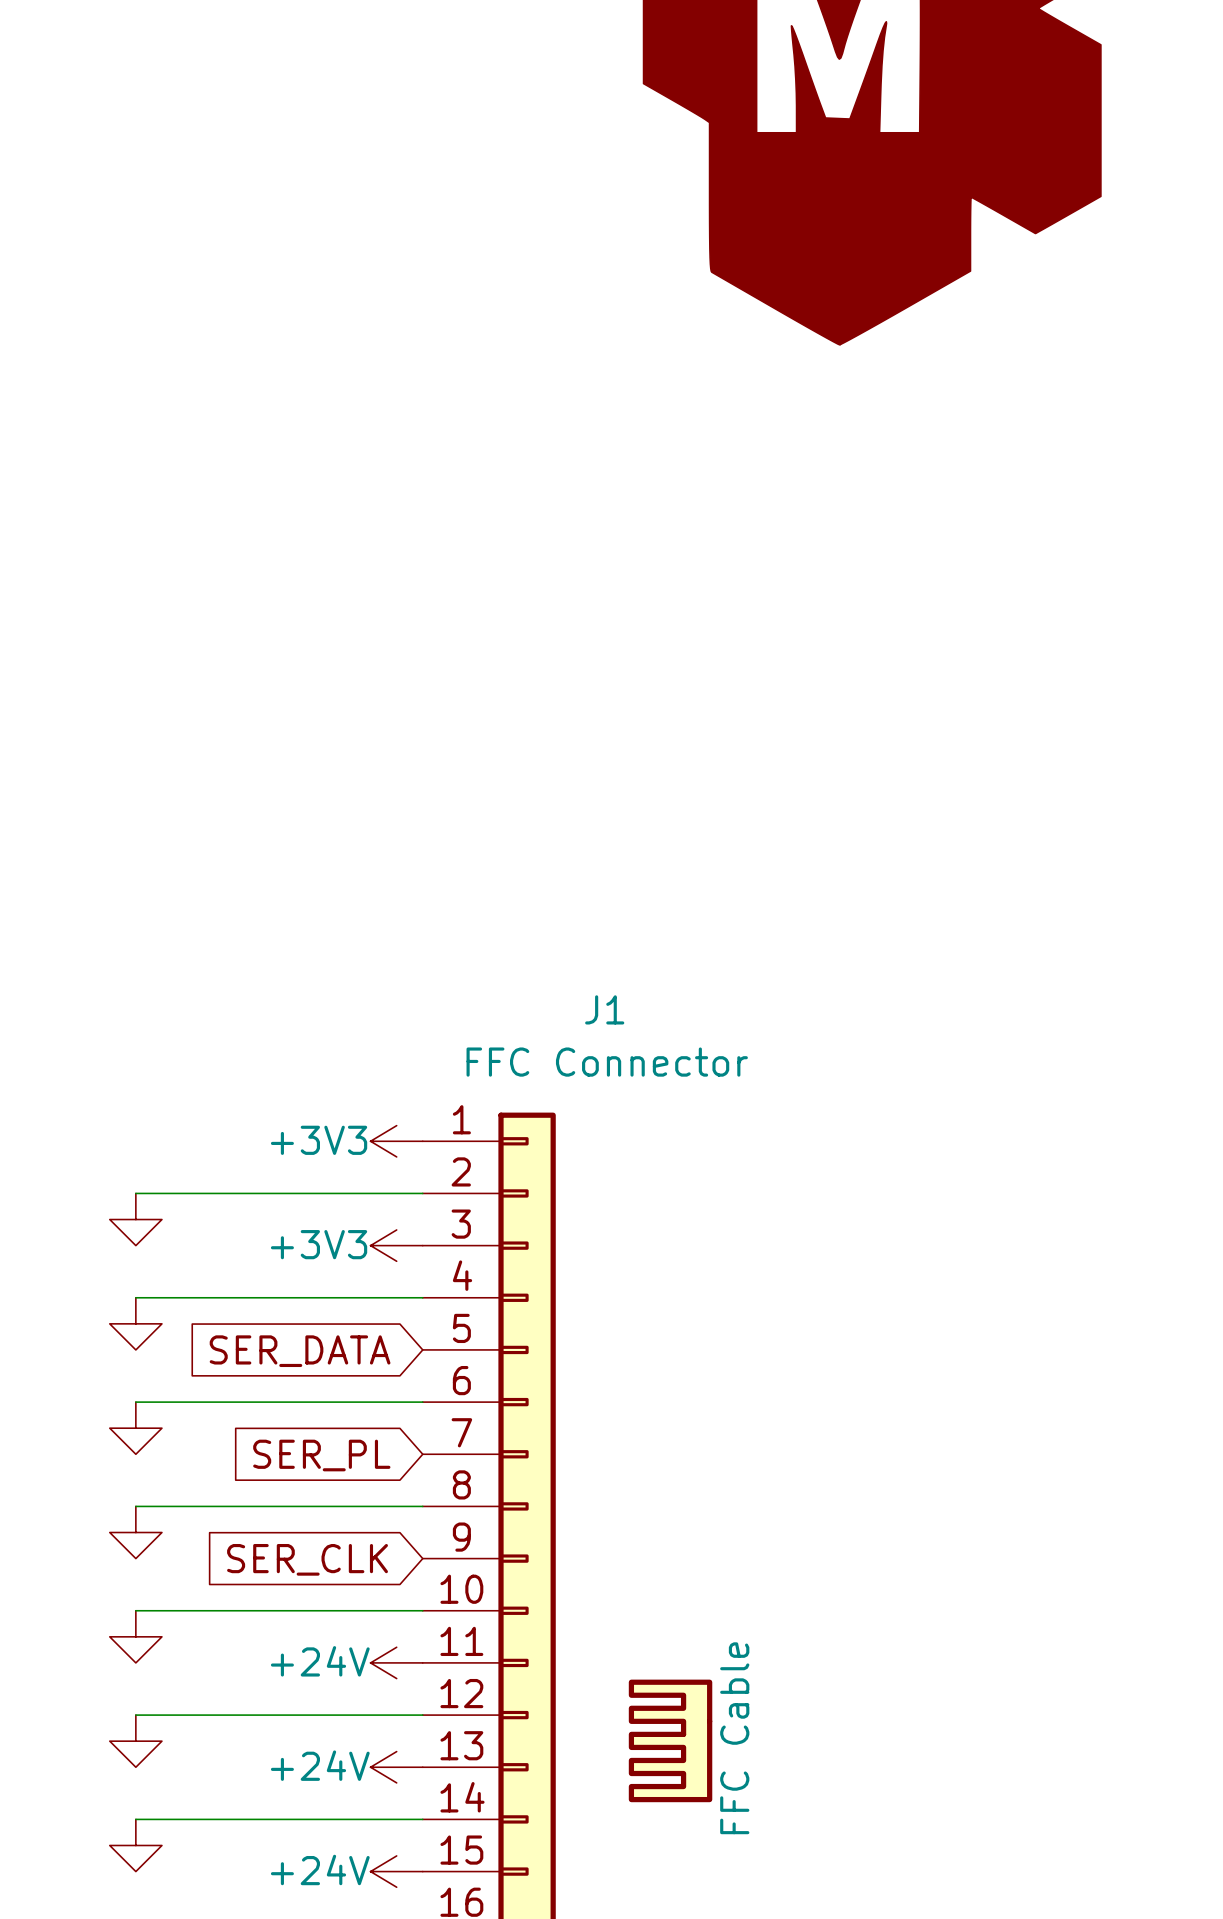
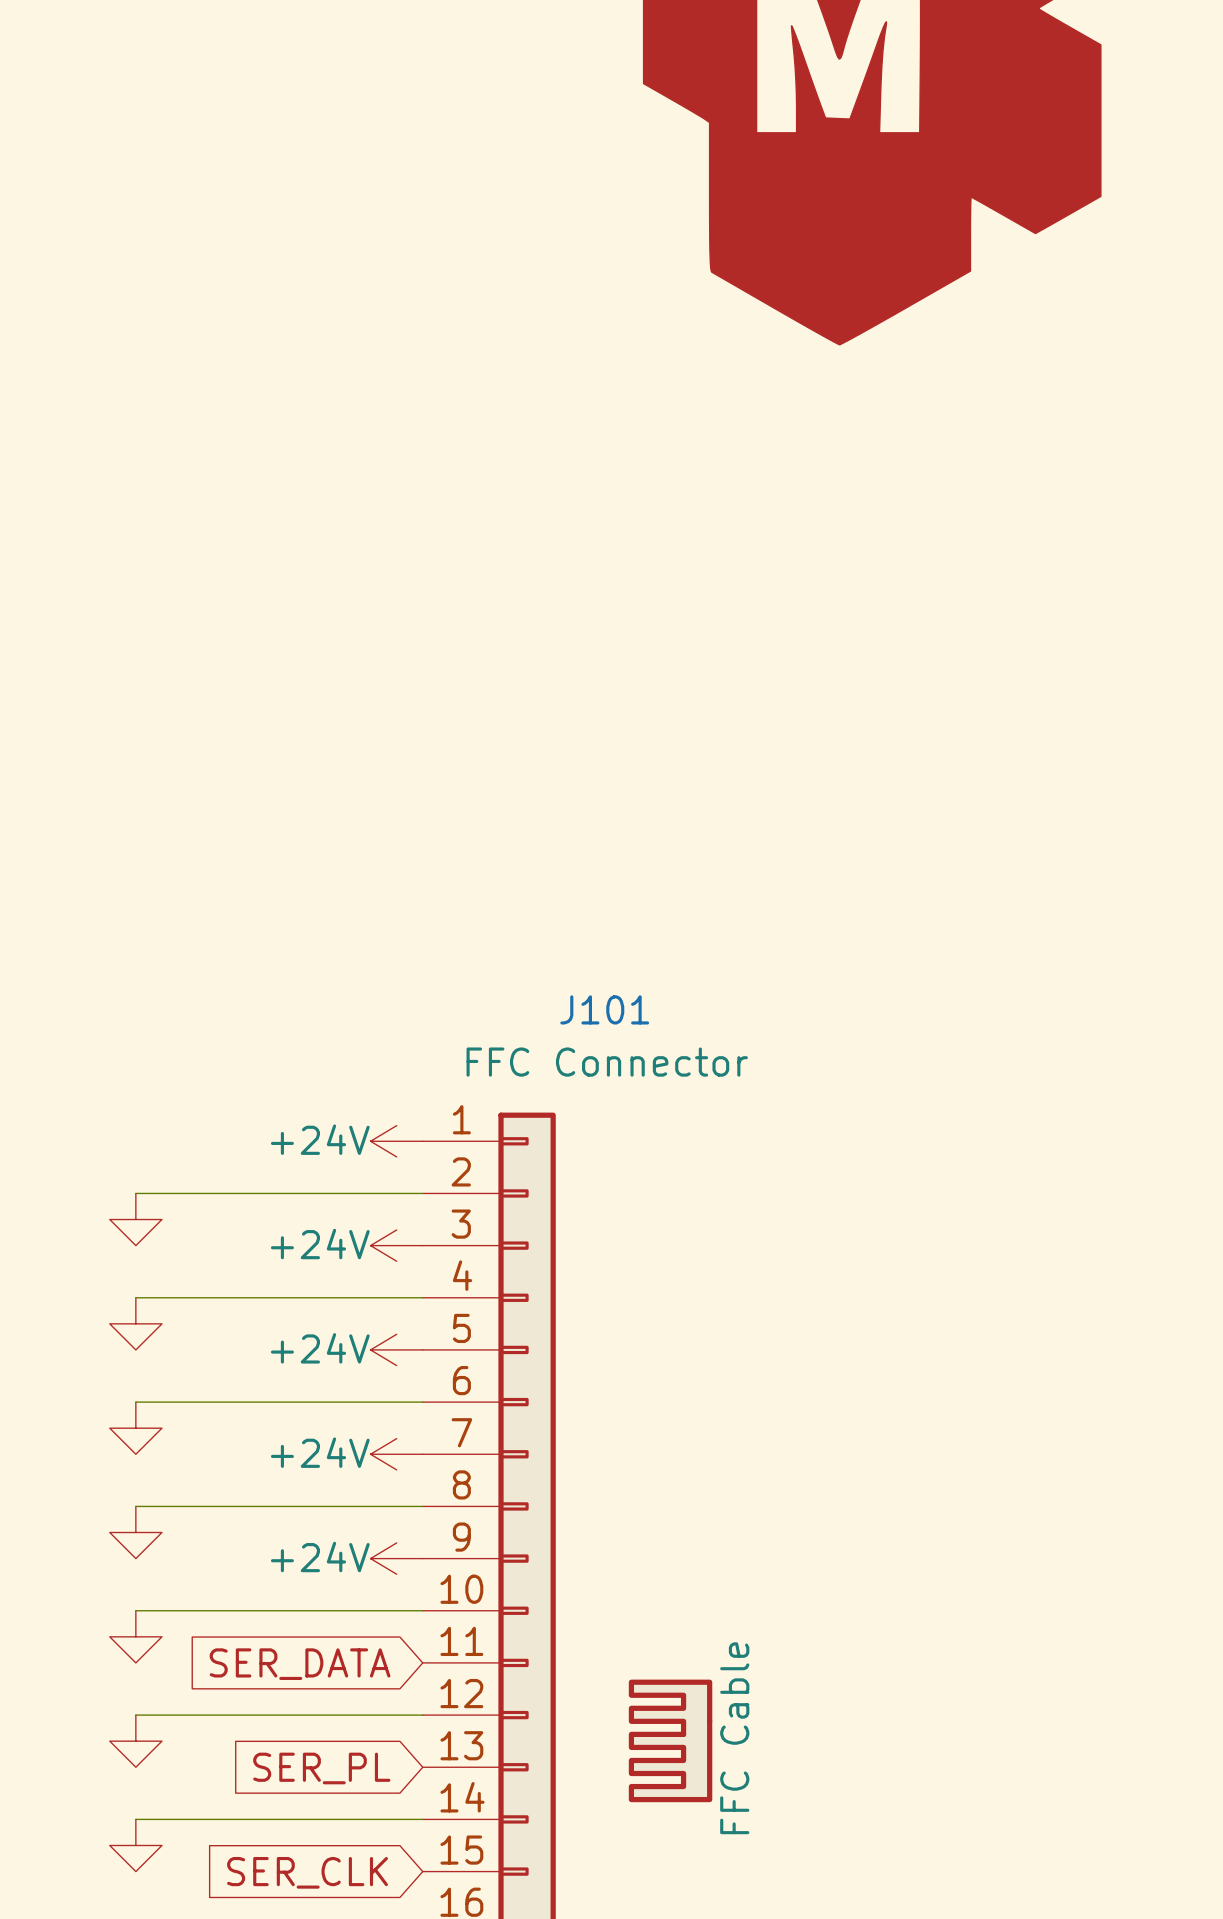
J1 name: J1 (604, 1009) -> J101 (604, 1009)
power symbol: +3V3 (396, 1141) -> +24V (396, 1141)
power symbol: +3V3 (396, 1245) -> +24V (396, 1245)
power symbol: none -> +24V (396, 1349)
global label position: SER_DATA (300, 1351) -> SER_DATA (300, 1664)
power symbol: none -> +24V (396, 1454)
global label position: SER_PL (321, 1455) -> SER_PL (321, 1768)
power symbol: none -> +24V (396, 1558)
global label position: SER_CLK (307, 1559) -> SER_CLK (307, 1872)
power symbol: +24V (396, 1662) -> none
power symbol: +24V (396, 1767) -> none
power symbol: +24V (396, 1871) -> none

